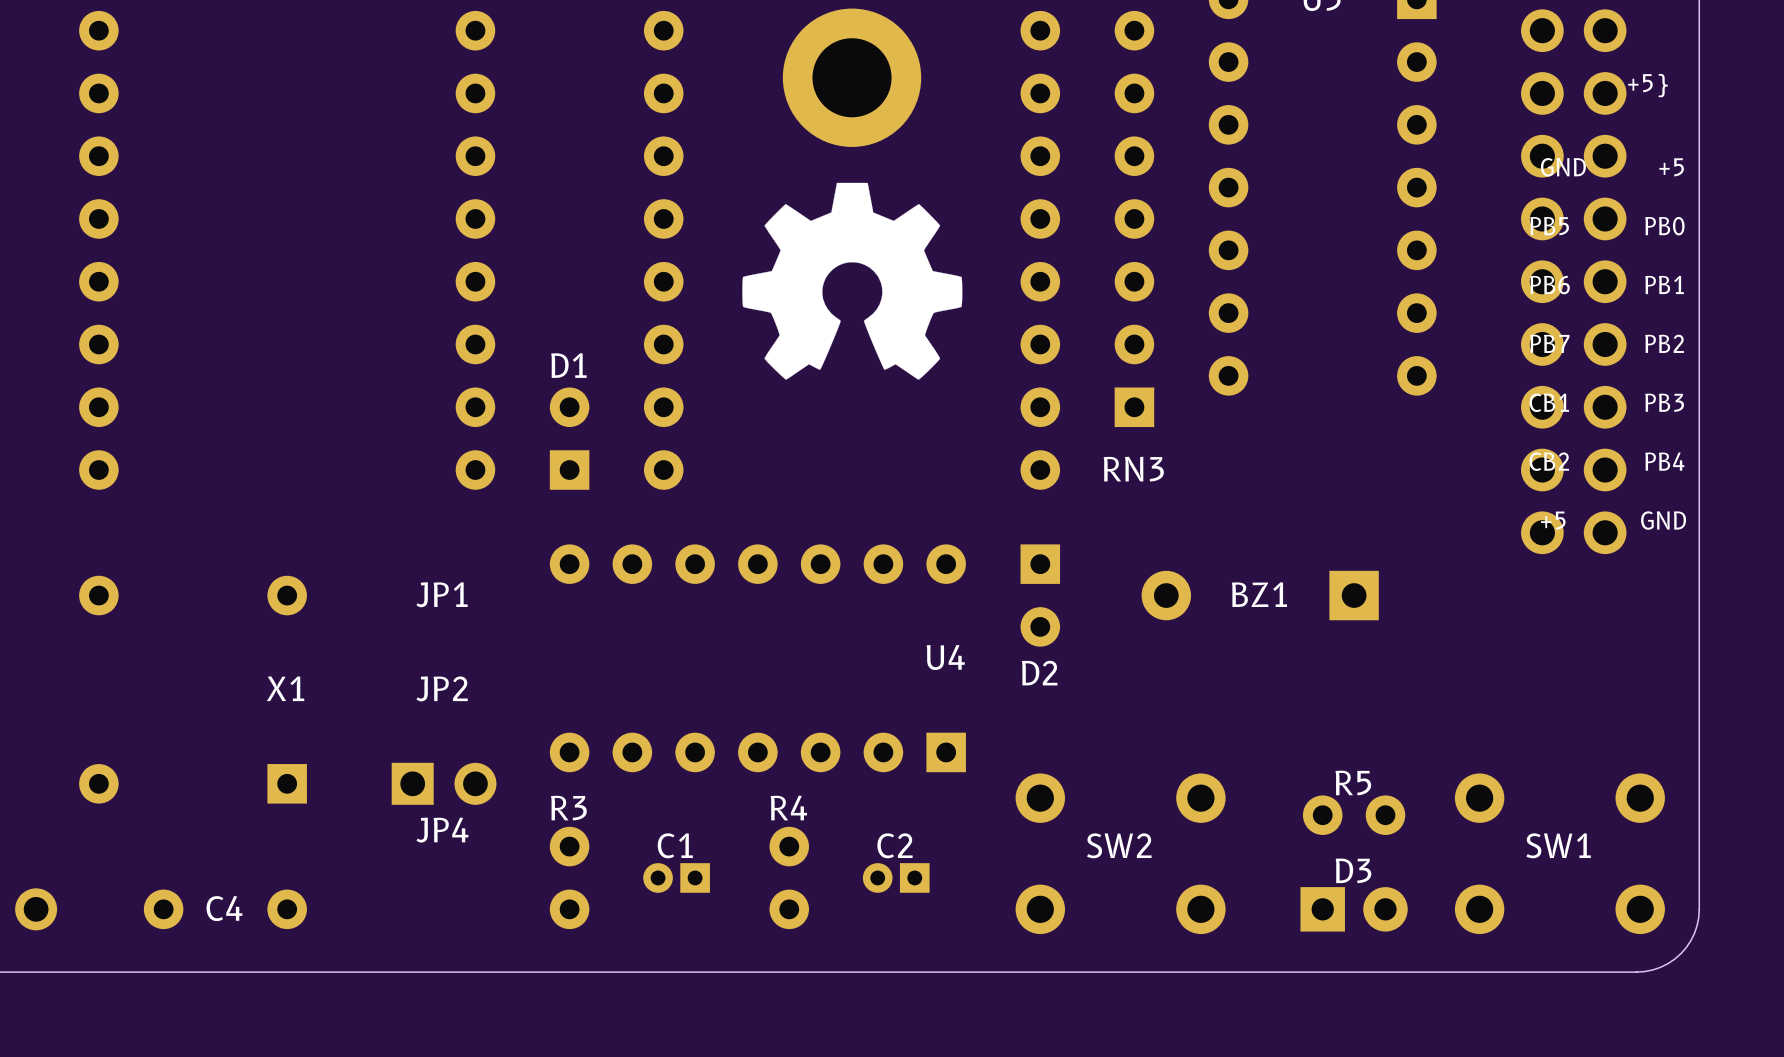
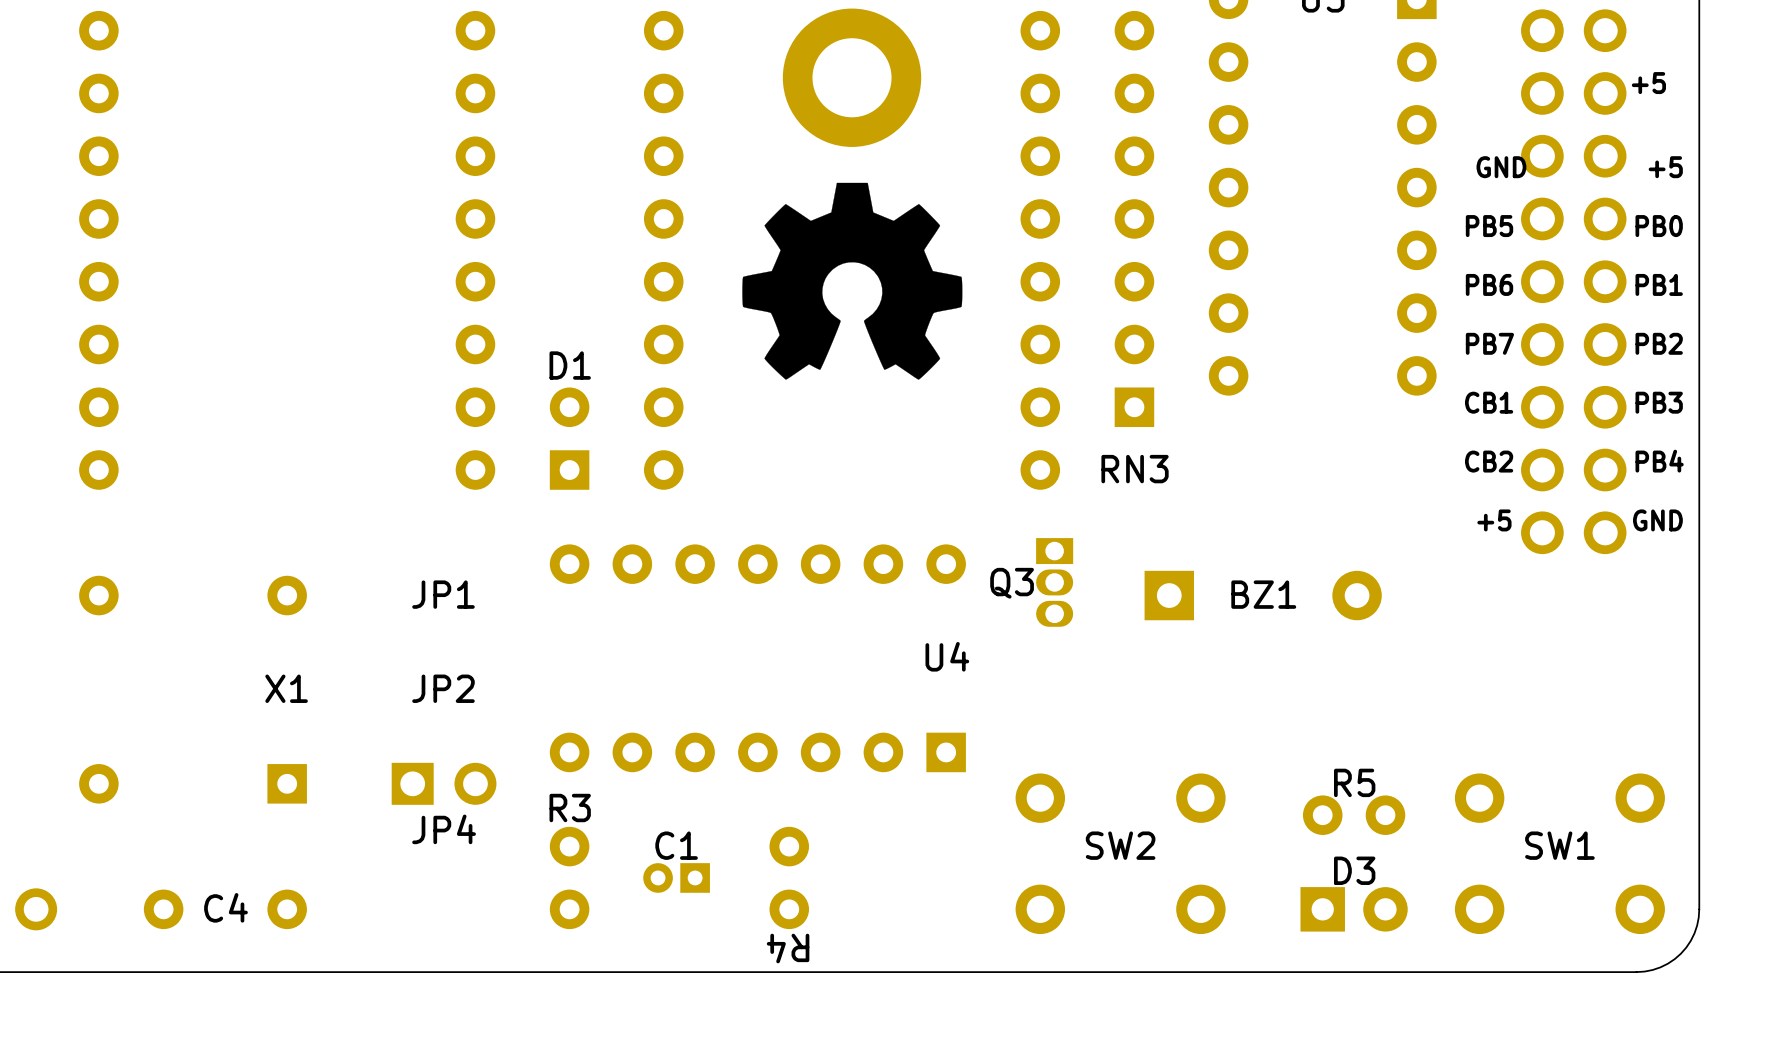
text: +5} (1648, 85) -> +5 (1648, 83)
Q3: none -> (1054, 582)
D2: (1040, 595) -> none
BZ1 rotation: 0° (1260, 595) -> 180° (1263, 595)
R4 name rotation: 0° (788, 808) -> 180° (788, 948)
R4 name position: R4 (788, 808) -> R4 (788, 948)
C2: (896, 877) -> none

